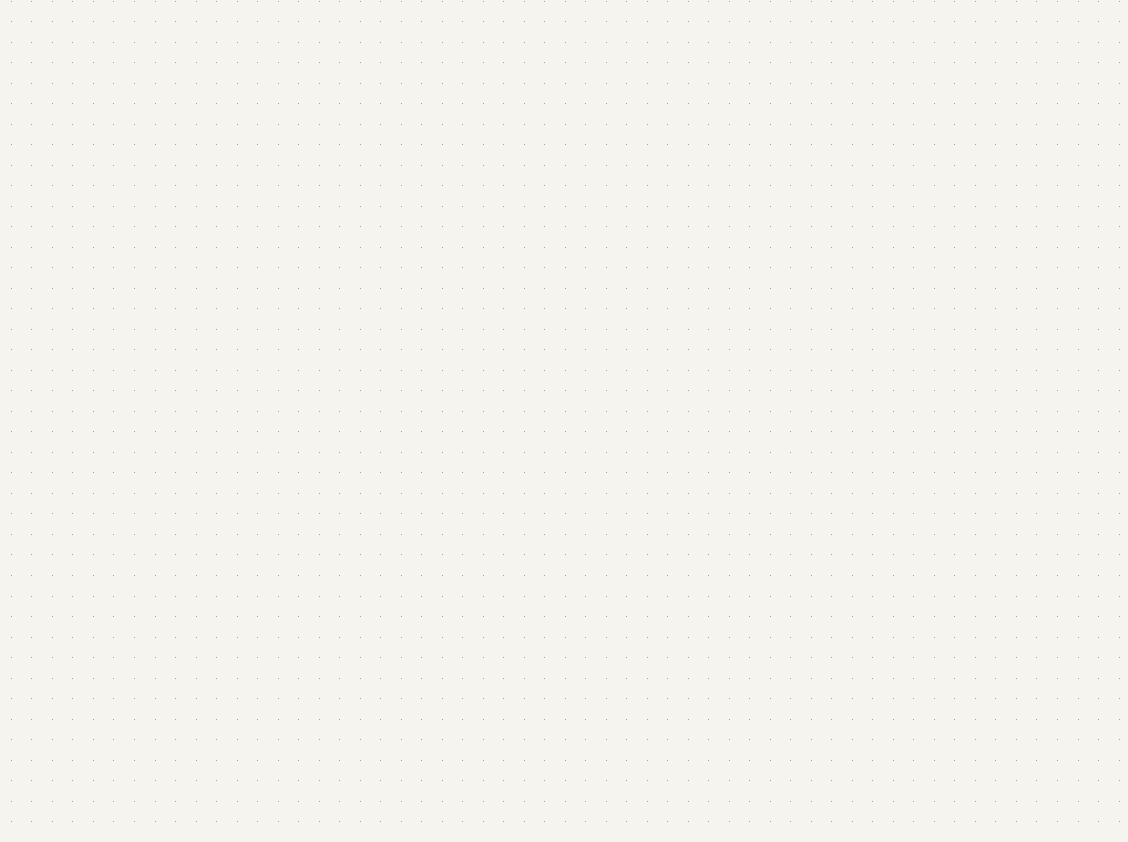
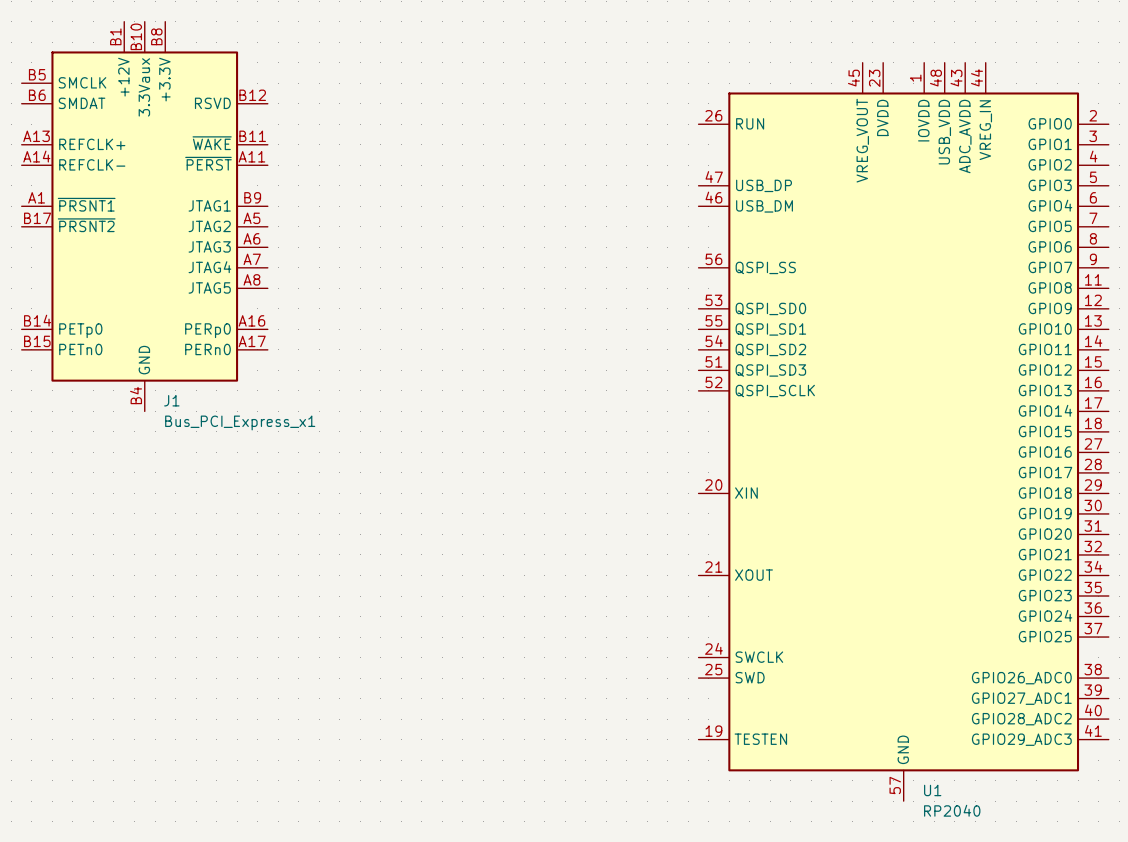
J1: none -> Bus_PCI_Express_x1 (144, 216)
U1: none -> RP2040 (903, 431)

